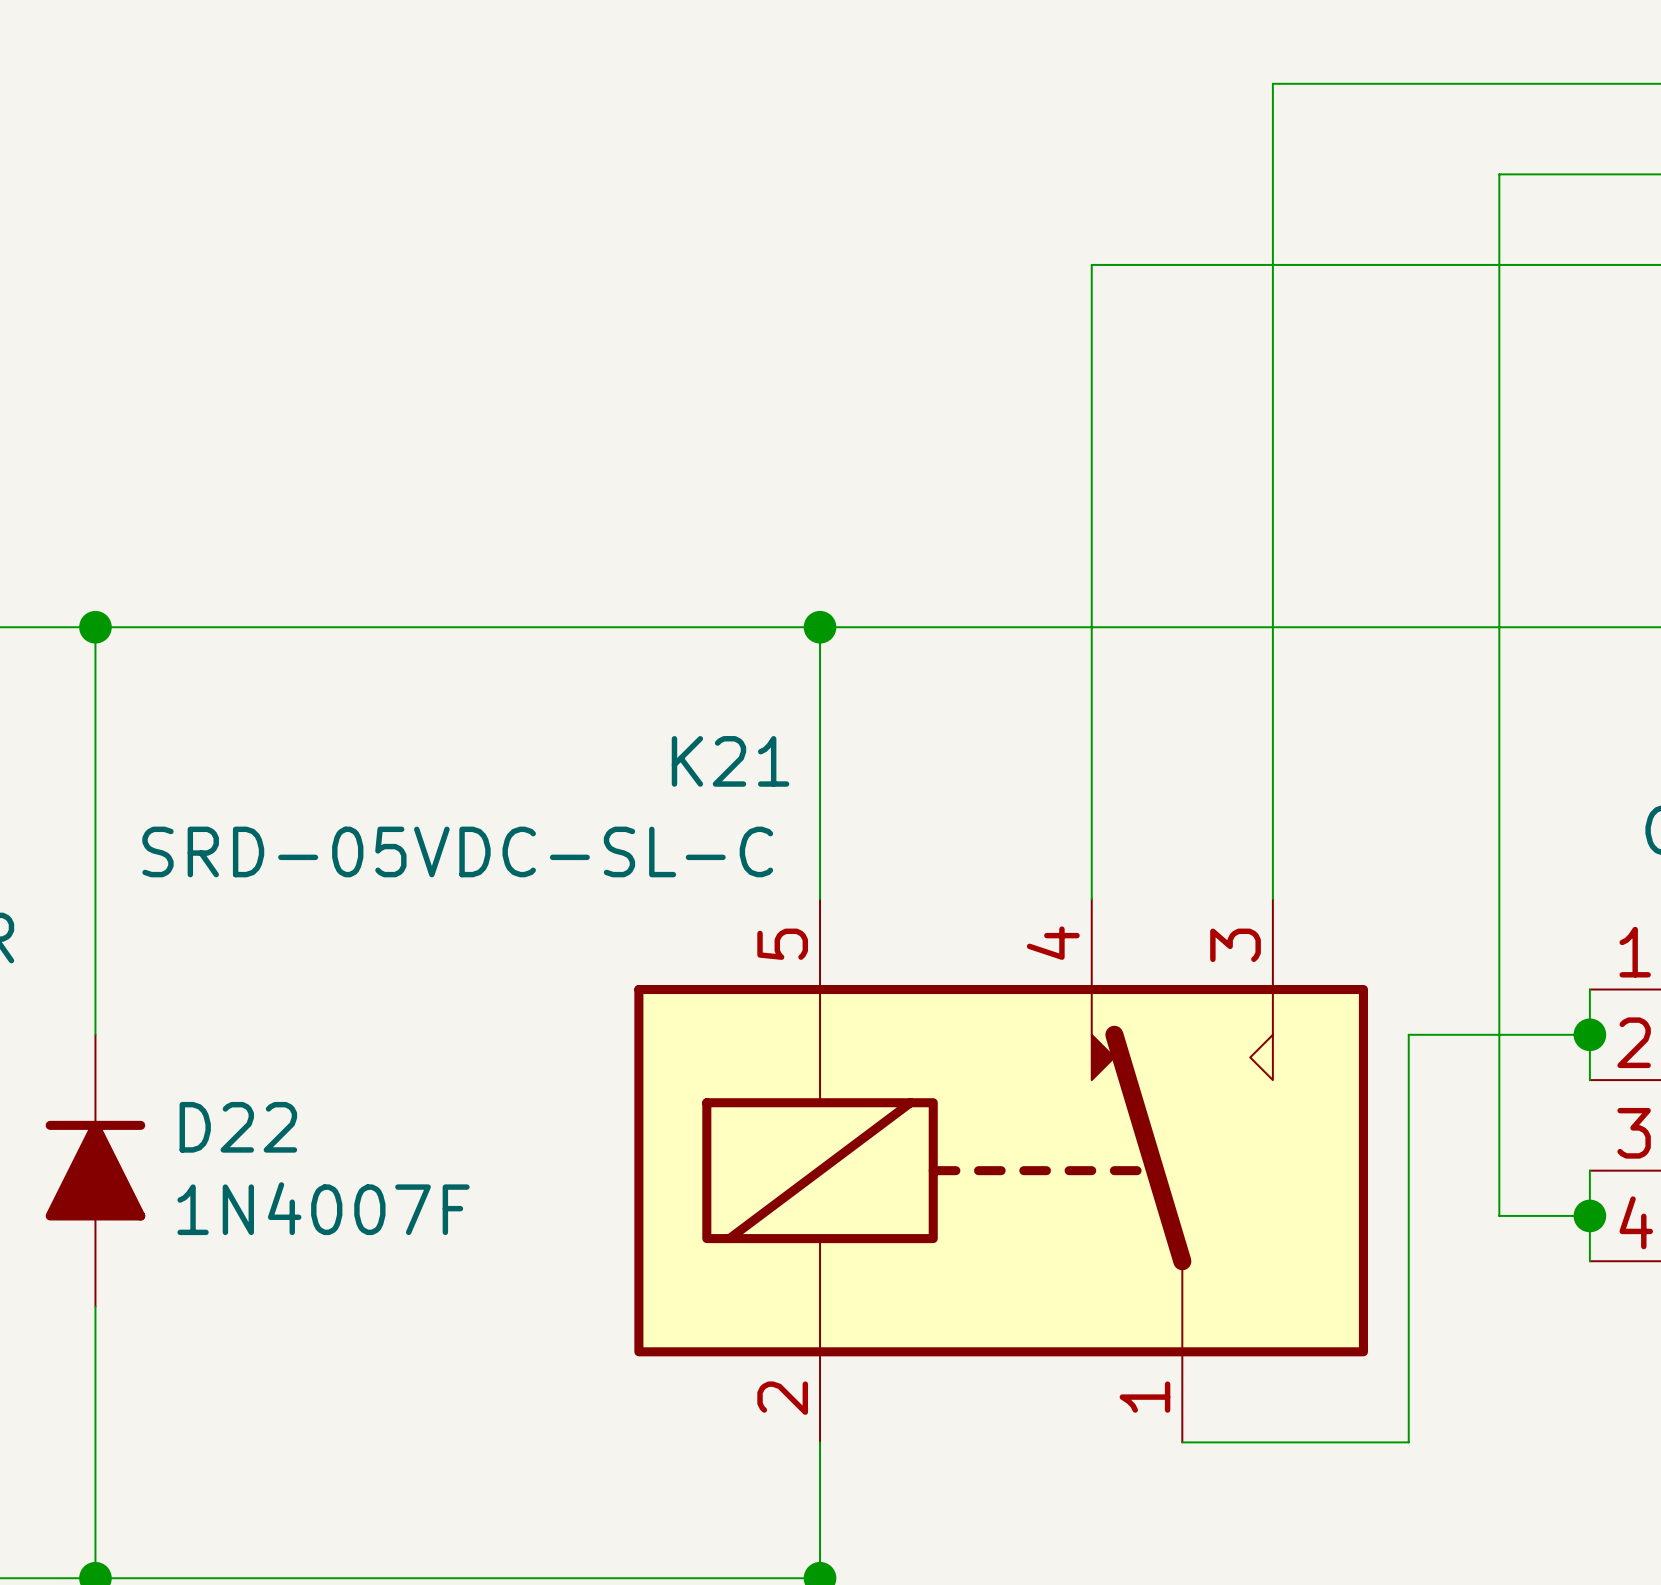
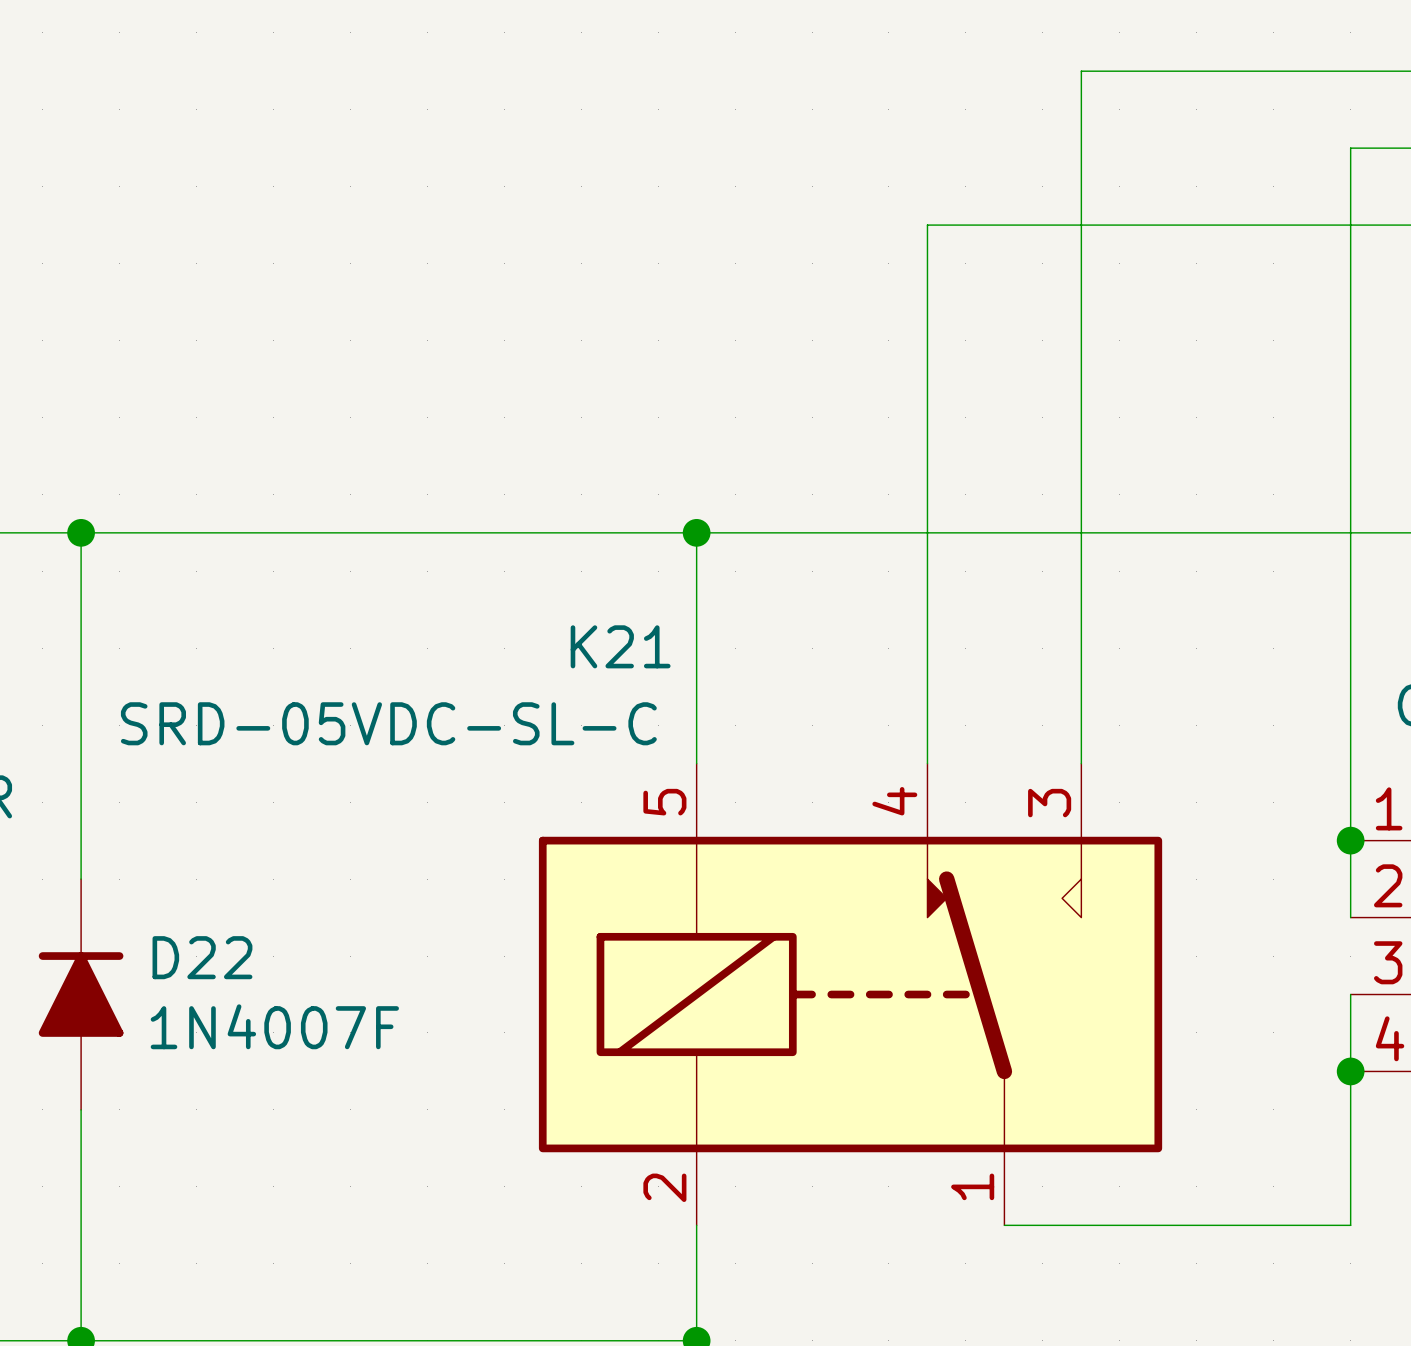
wire: (1589, 174) (1499, 174) (1499, 1215) (1589, 1215) -> (1350, 148) (1350, 840)
wire: (1589, 1034) (1408, 1034) (1408, 1442) -> (1350, 1071) (1350, 1225) (1196, 1225)
junction position: (1589, 1034) -> (1350, 840)
junction position: (1589, 1215) -> (1350, 1071)

